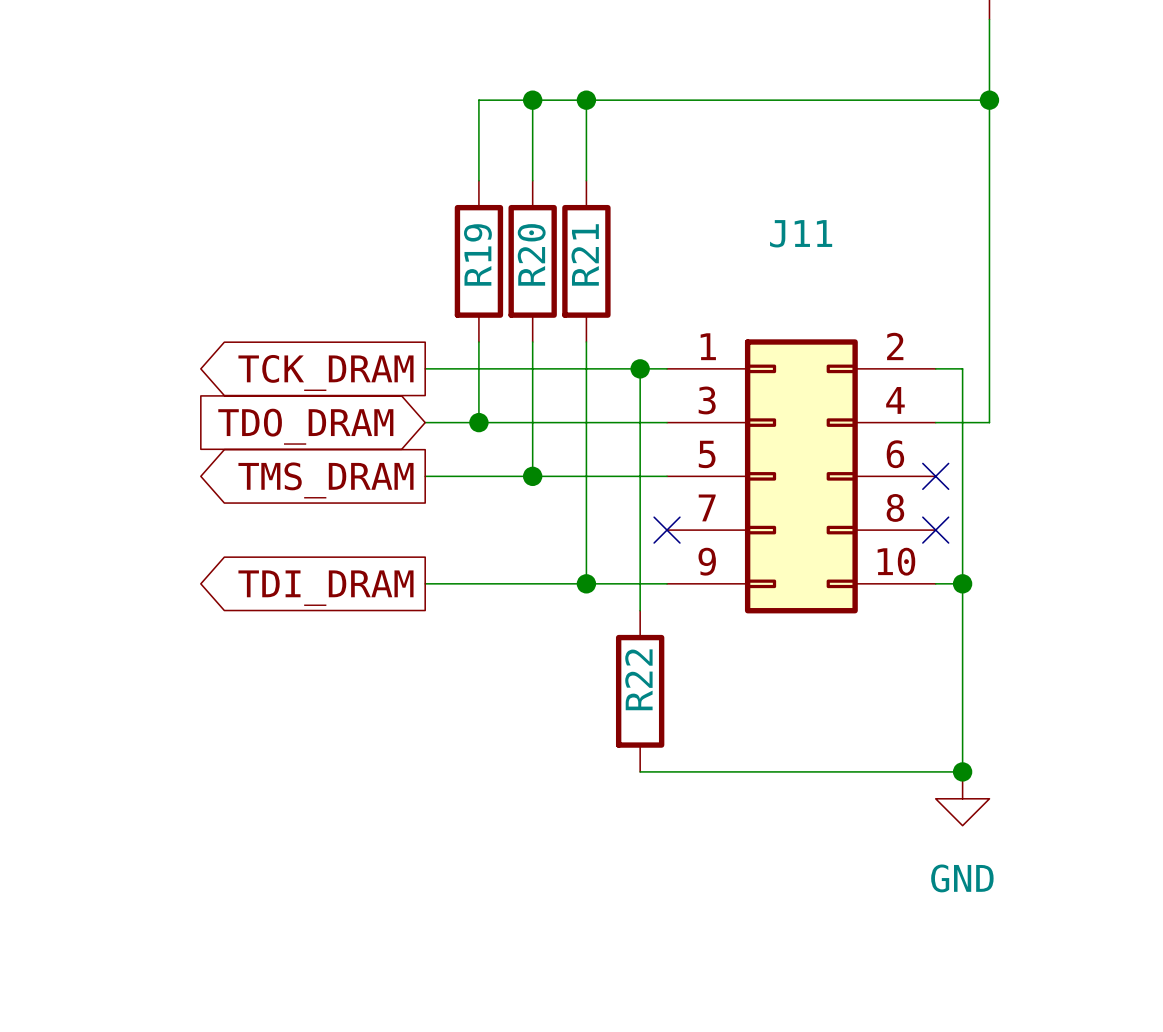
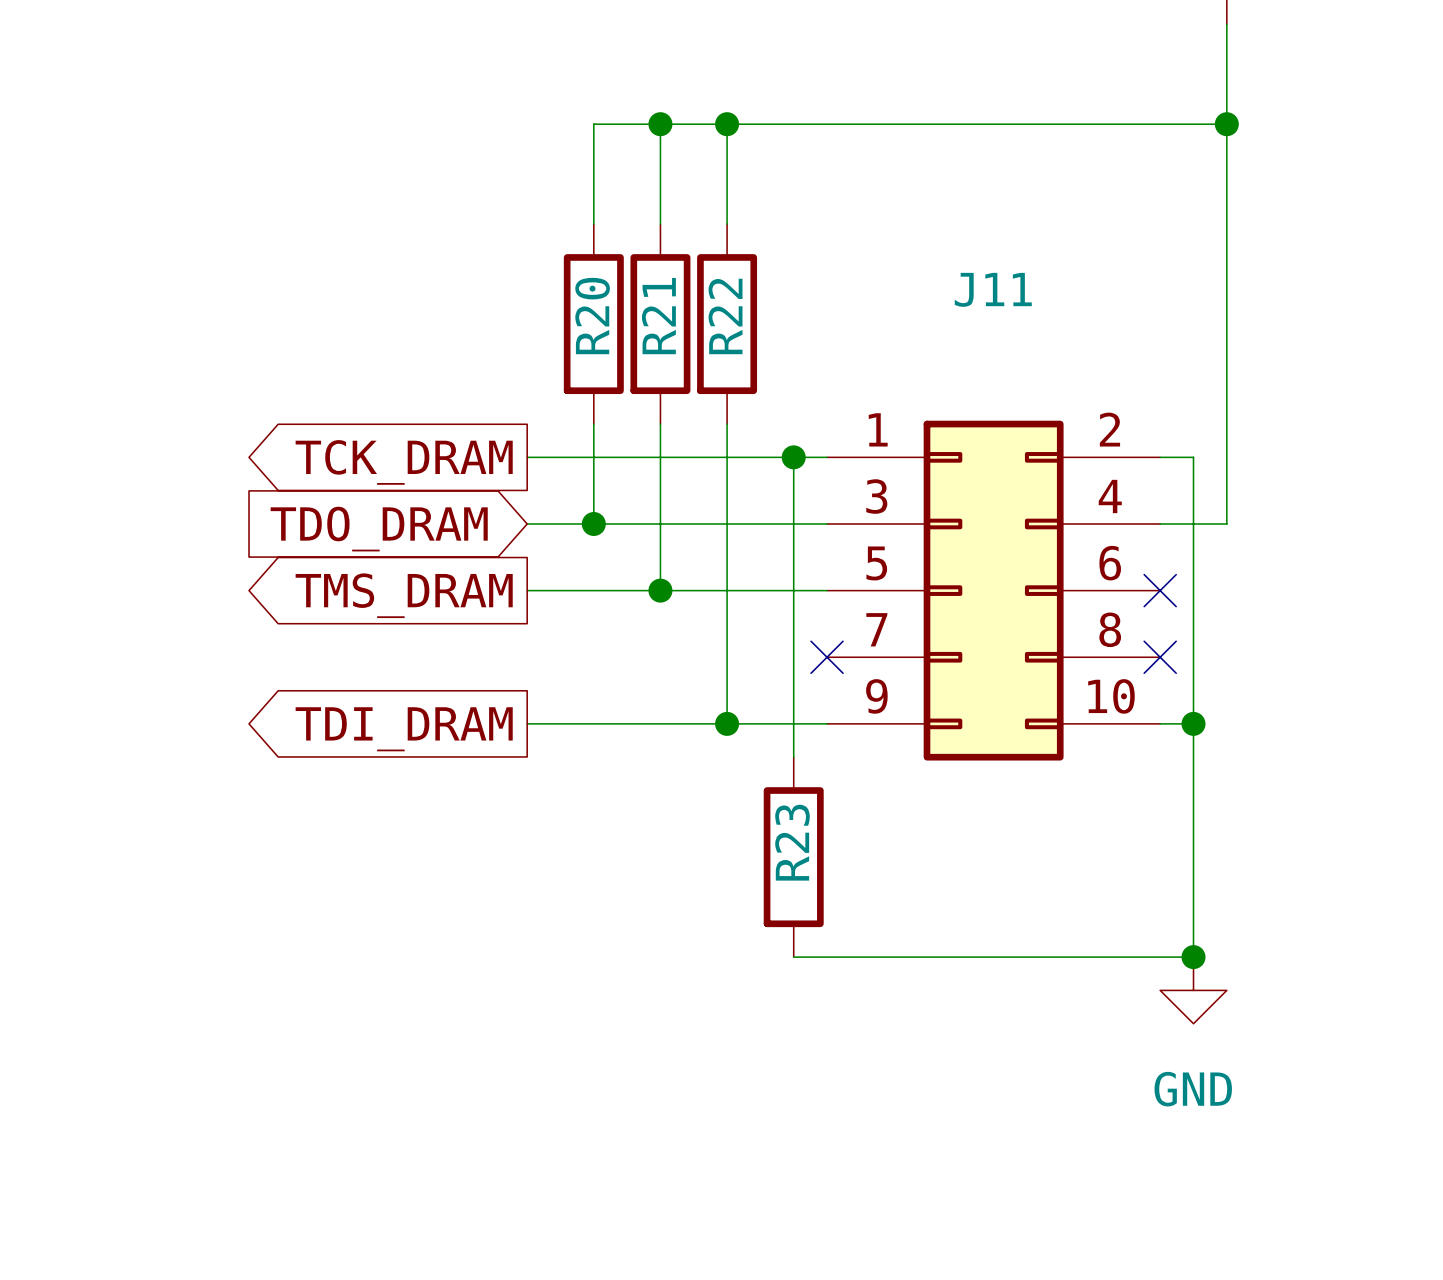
R19 name: R19 (477, 254) -> R20 (592, 316)
R20 name: R20 (531, 254) -> R21 (658, 316)
R21 name: R21 (585, 254) -> R22 (725, 316)
R22 name: R22 (638, 679) -> R23 (792, 842)

